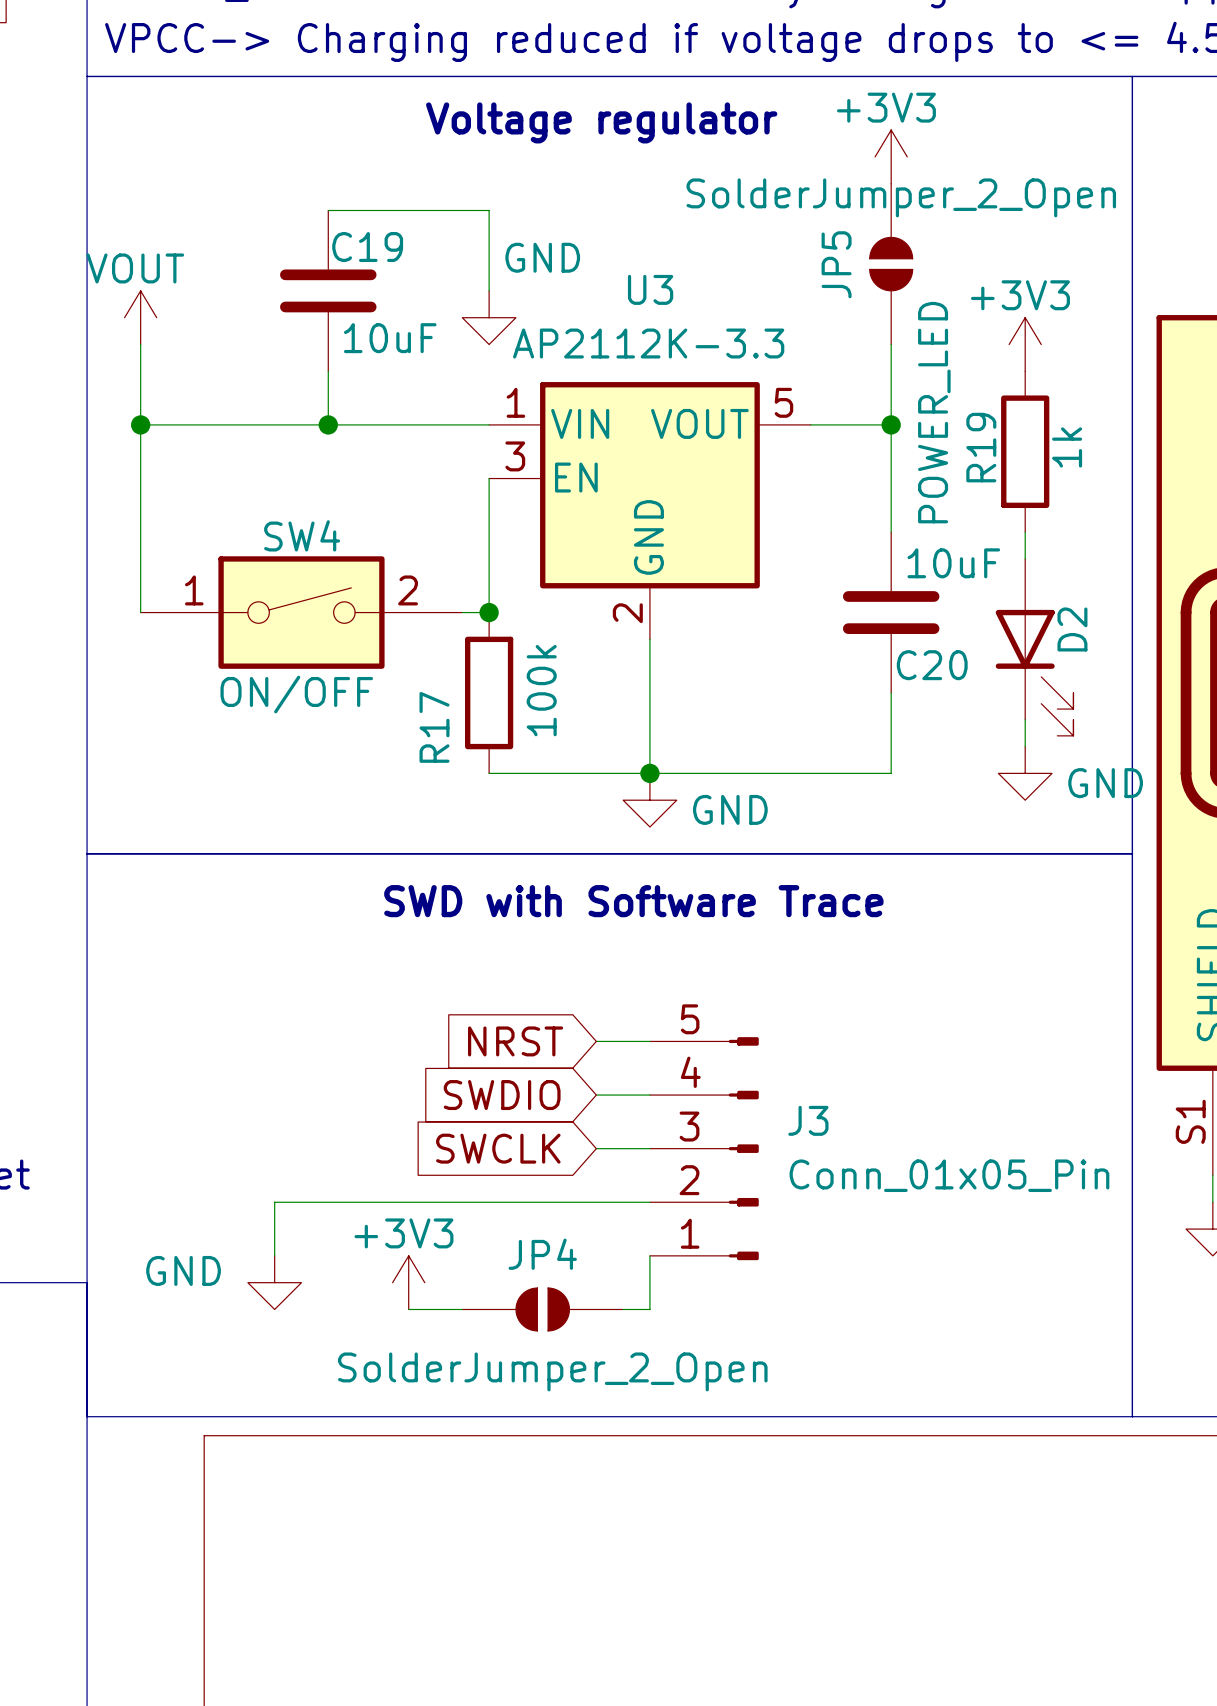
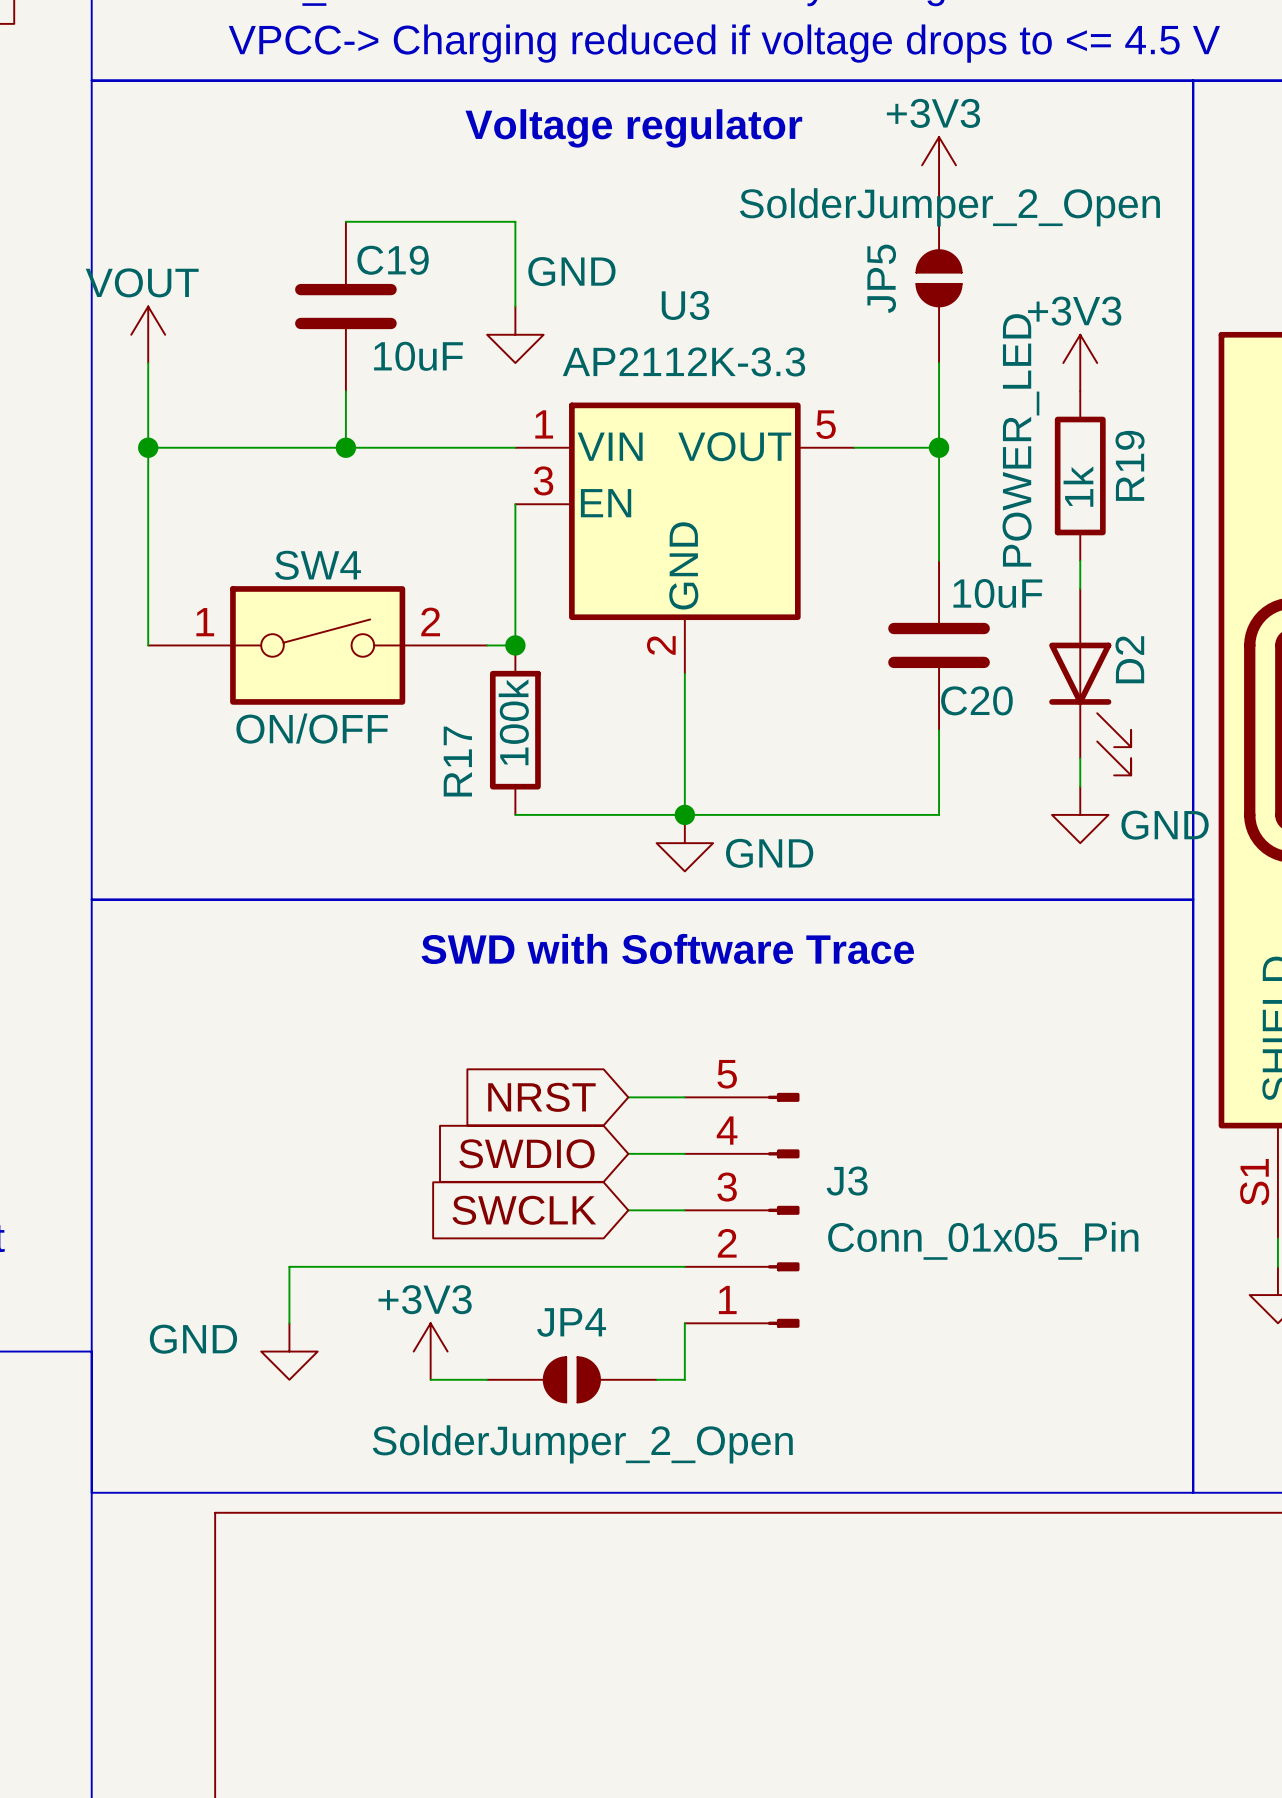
D2 value position: POWER_LED (934, 412) -> POWER_LED (1020, 440)
R19 name position: R19 (981, 447) -> R19 (1130, 465)
R19 value position: 1k (1067, 447) -> 1k (1078, 486)
R17 value position: 100k (541, 690) -> 100k (513, 722)

